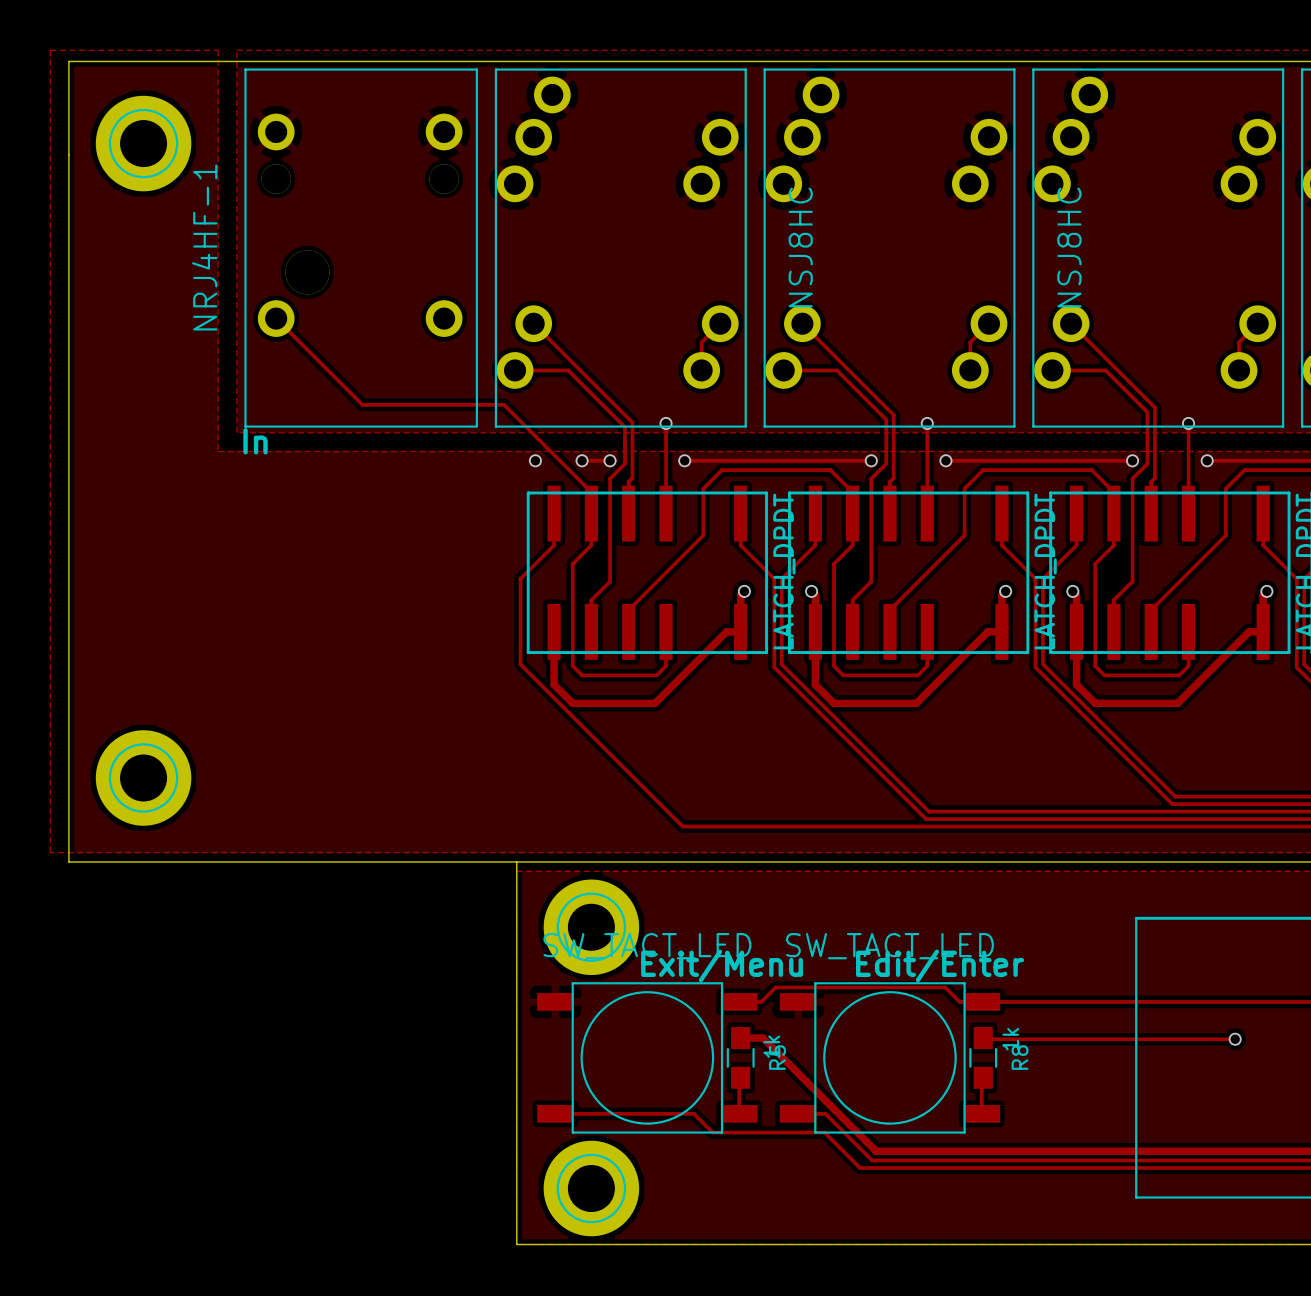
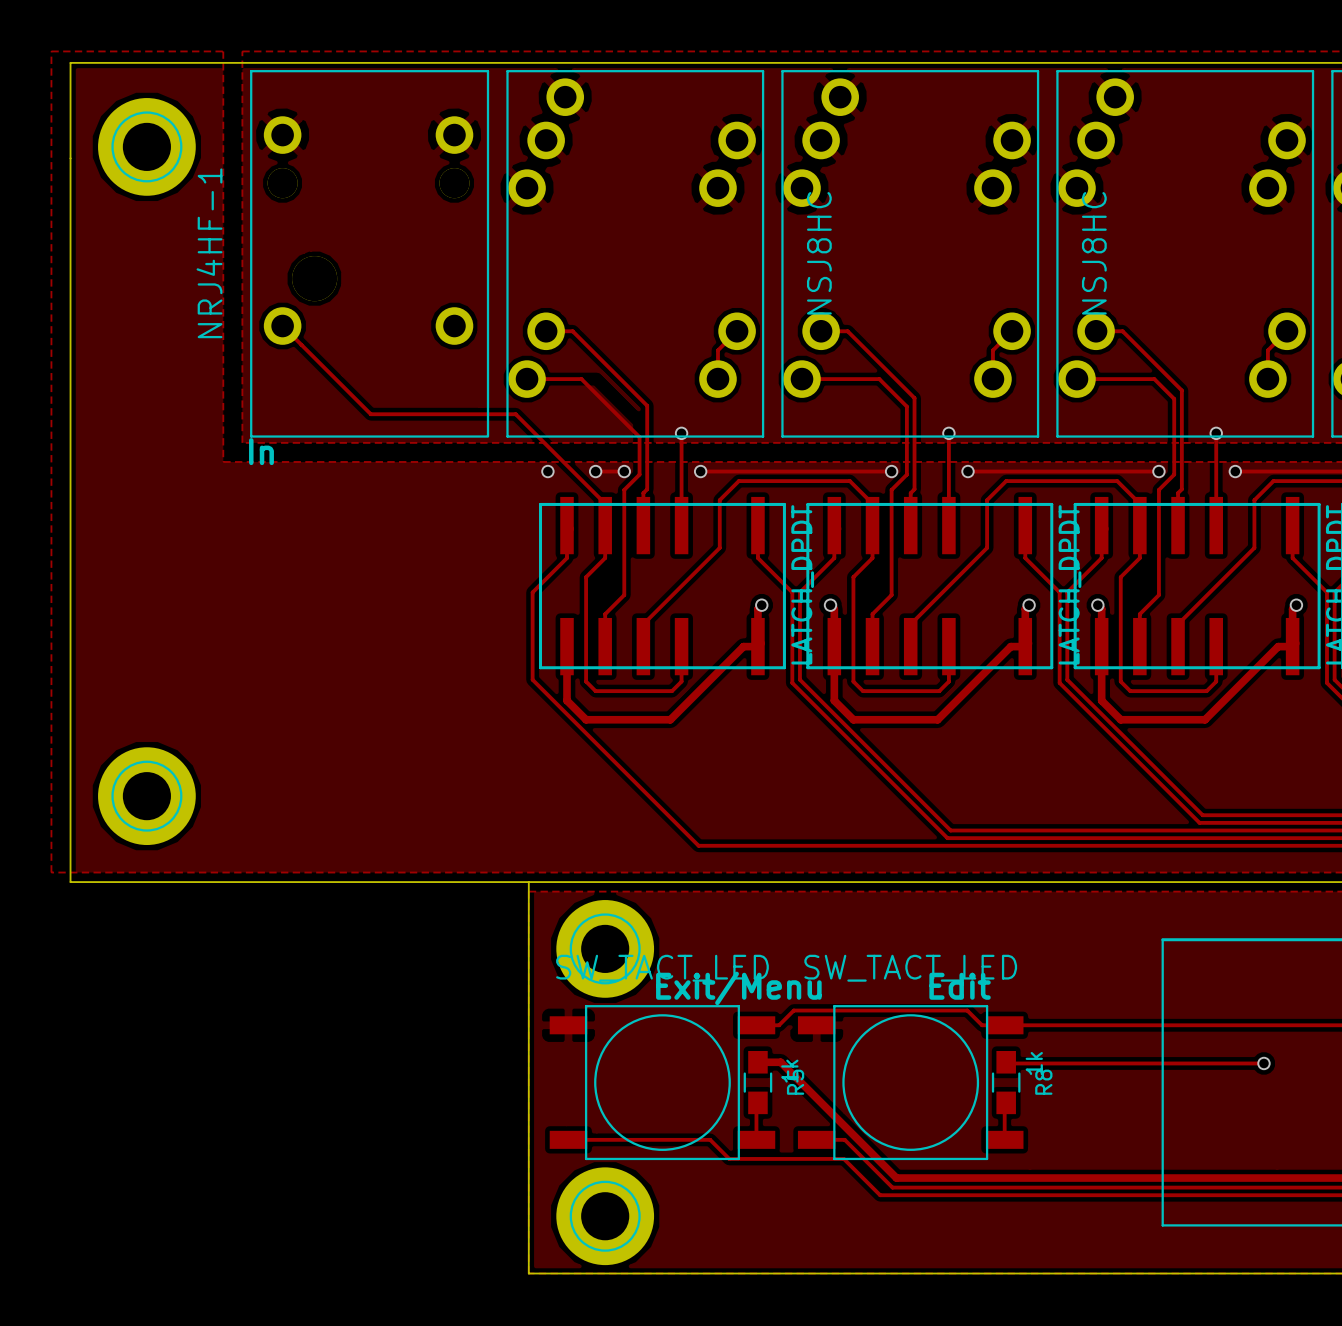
track: (533, 323) (632, 422) -> (546, 331) (572, 331) (647, 405) (647, 432)
track: (802, 323) (893, 415) -> (821, 331) (847, 331) (914, 398) (914, 424)
track: (1071, 323) (1154, 407) -> (1096, 331) (1122, 331) (1181, 390) (1181, 417)
track: (836, 370) (886, 419) -> (856, 379) (879, 379) (906, 406) (906, 429)
track: (1105, 370) (1147, 412) -> (1131, 379) (1154, 379) (1174, 398) (1174, 421)
text: Edit/Enter (940, 965) -> Edit (960, 986)

